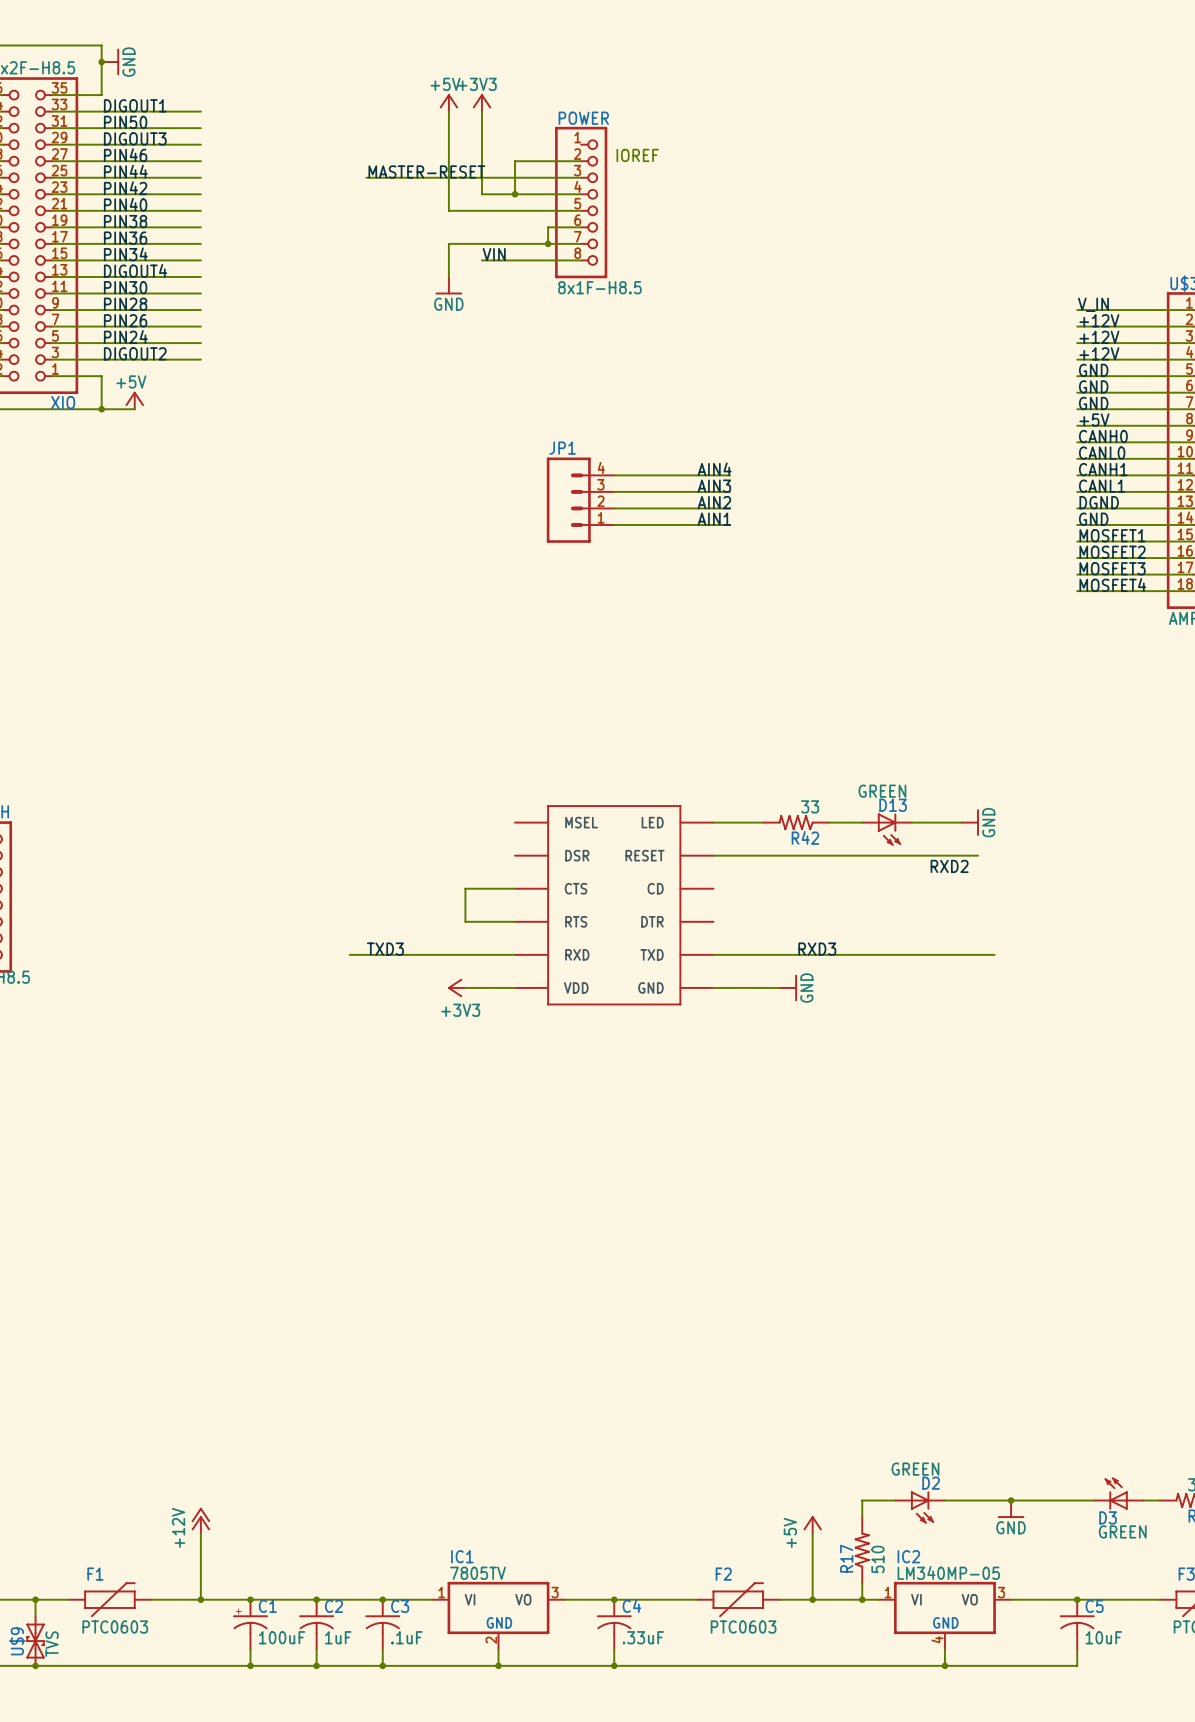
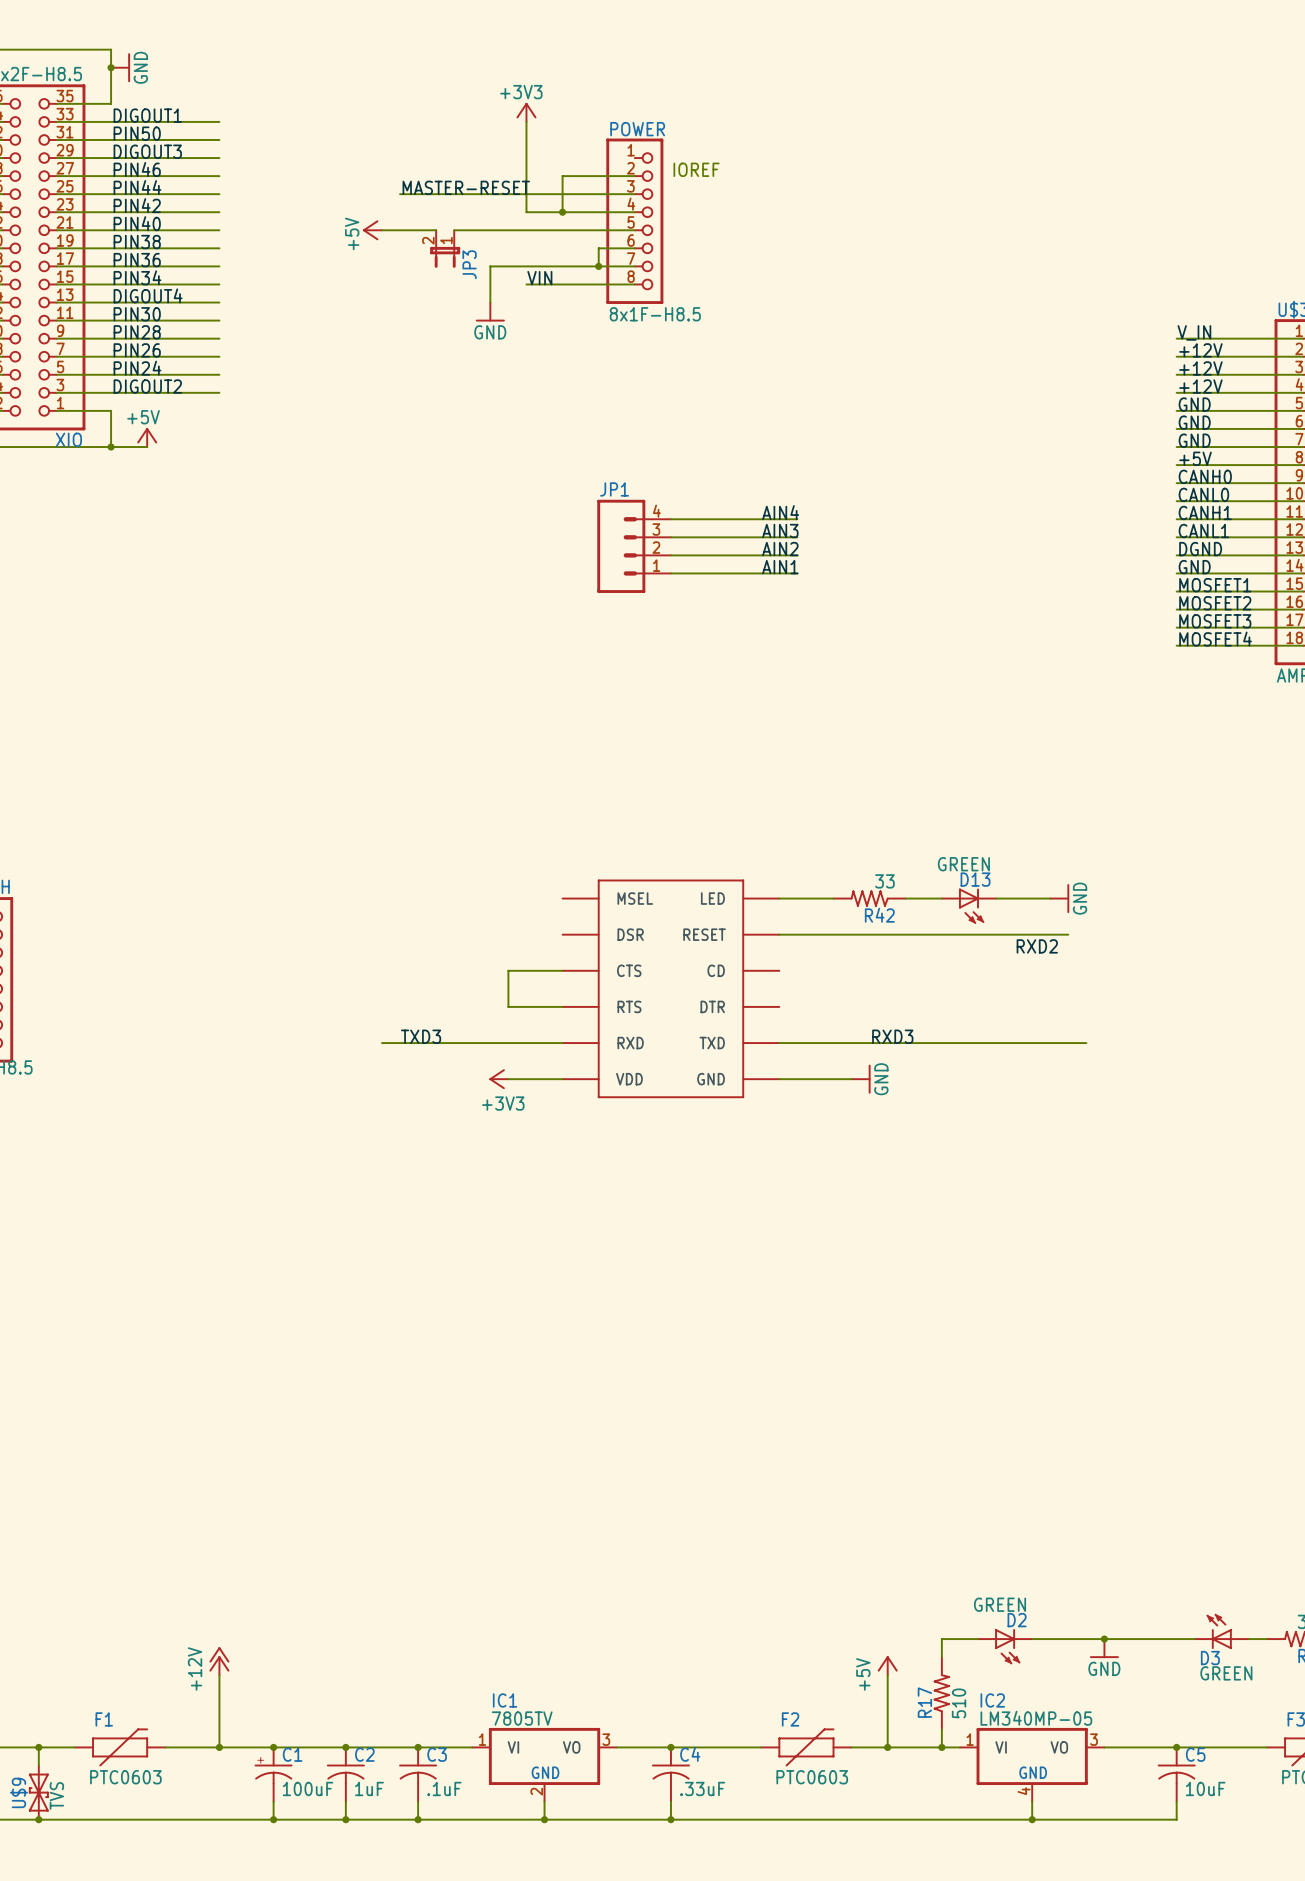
power symbol rotation: 0° (448, 101) -> 90° counterclockwise (370, 230)
power symbol position: +5V (448, 102) -> +5V (372, 230)
wire: (448, 111) (448, 210) -> (454, 230) (490, 230)
wire: none -> (381, 230) (436, 230)
JP3: none -> (445, 249)

